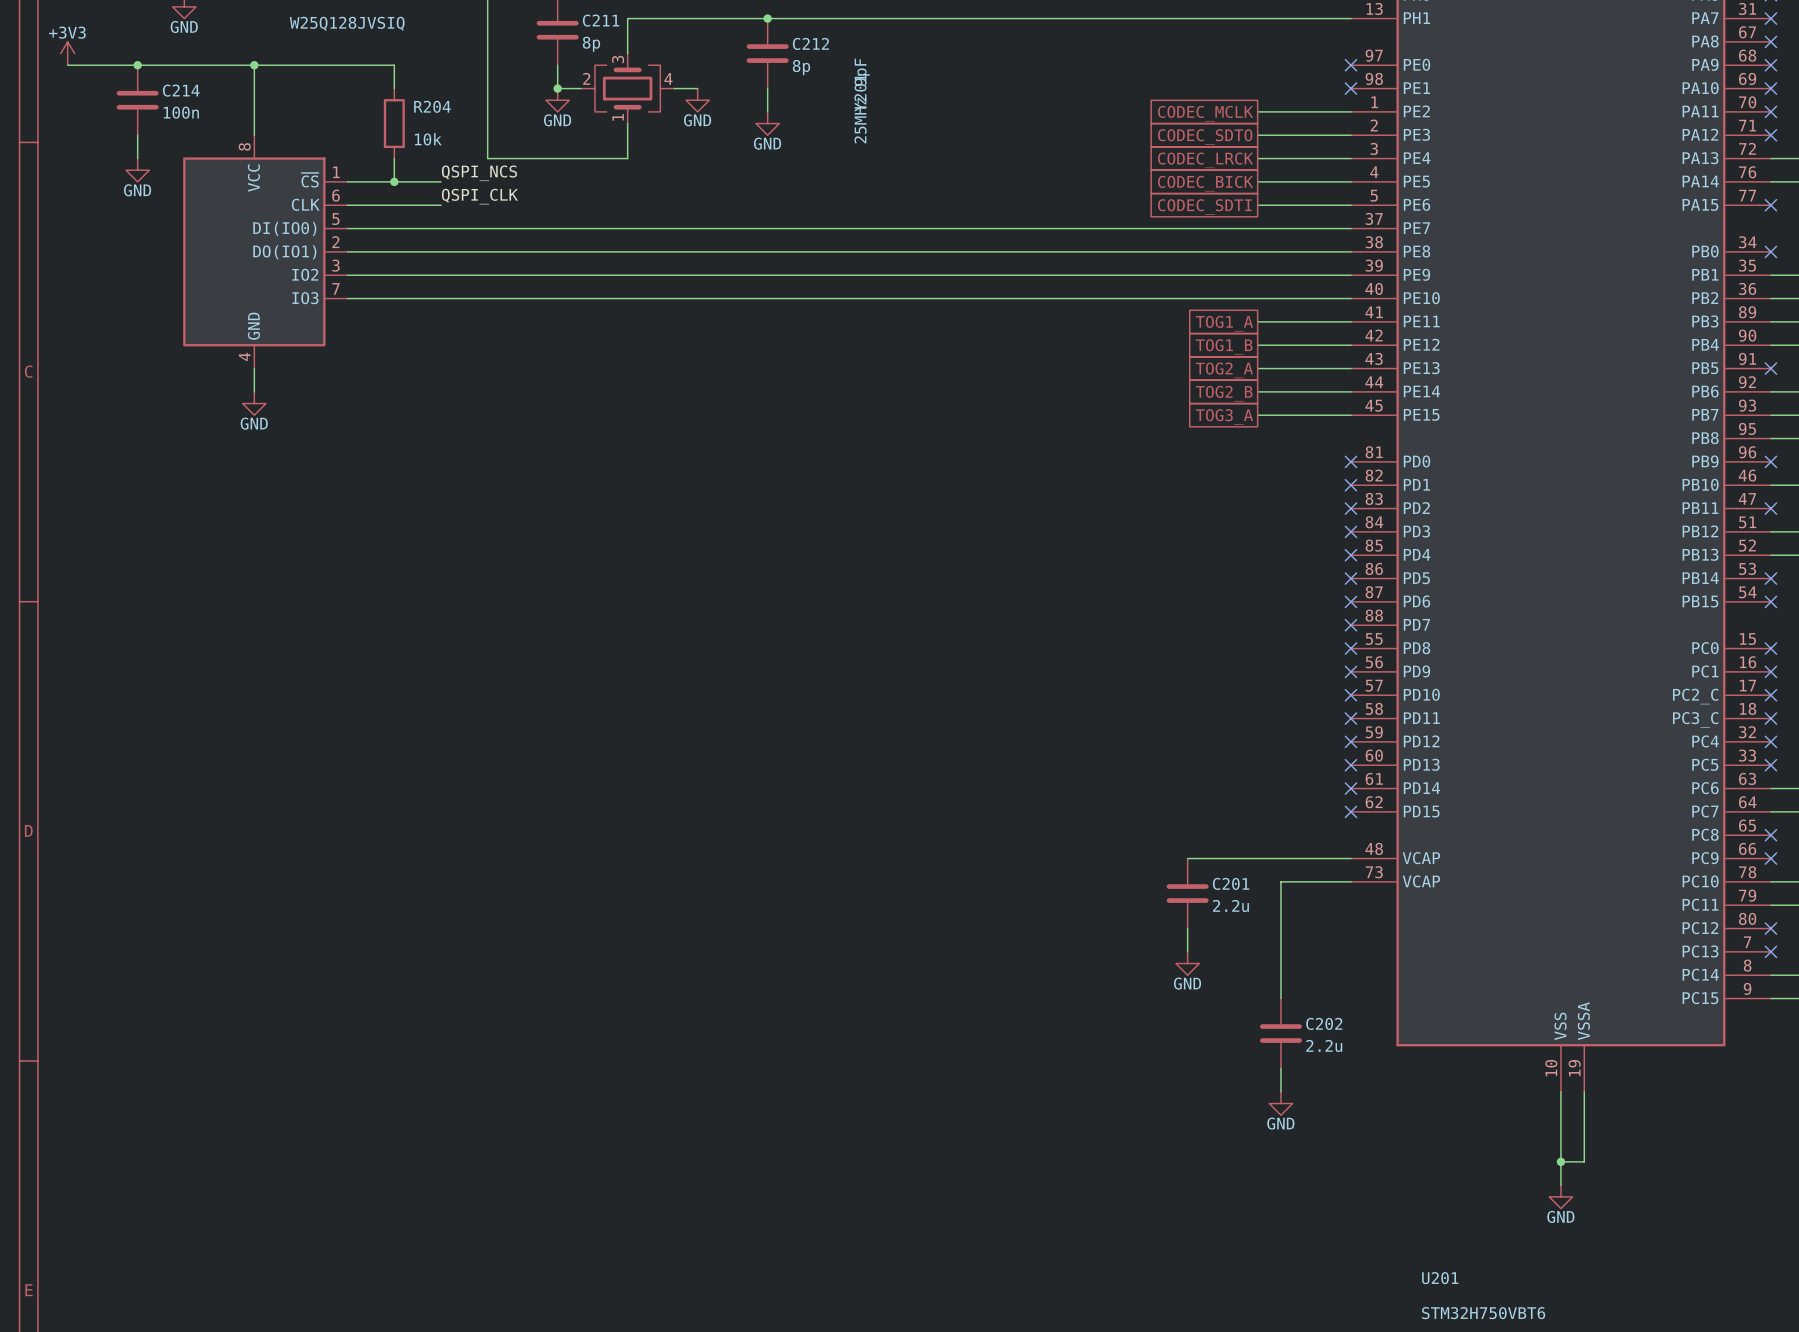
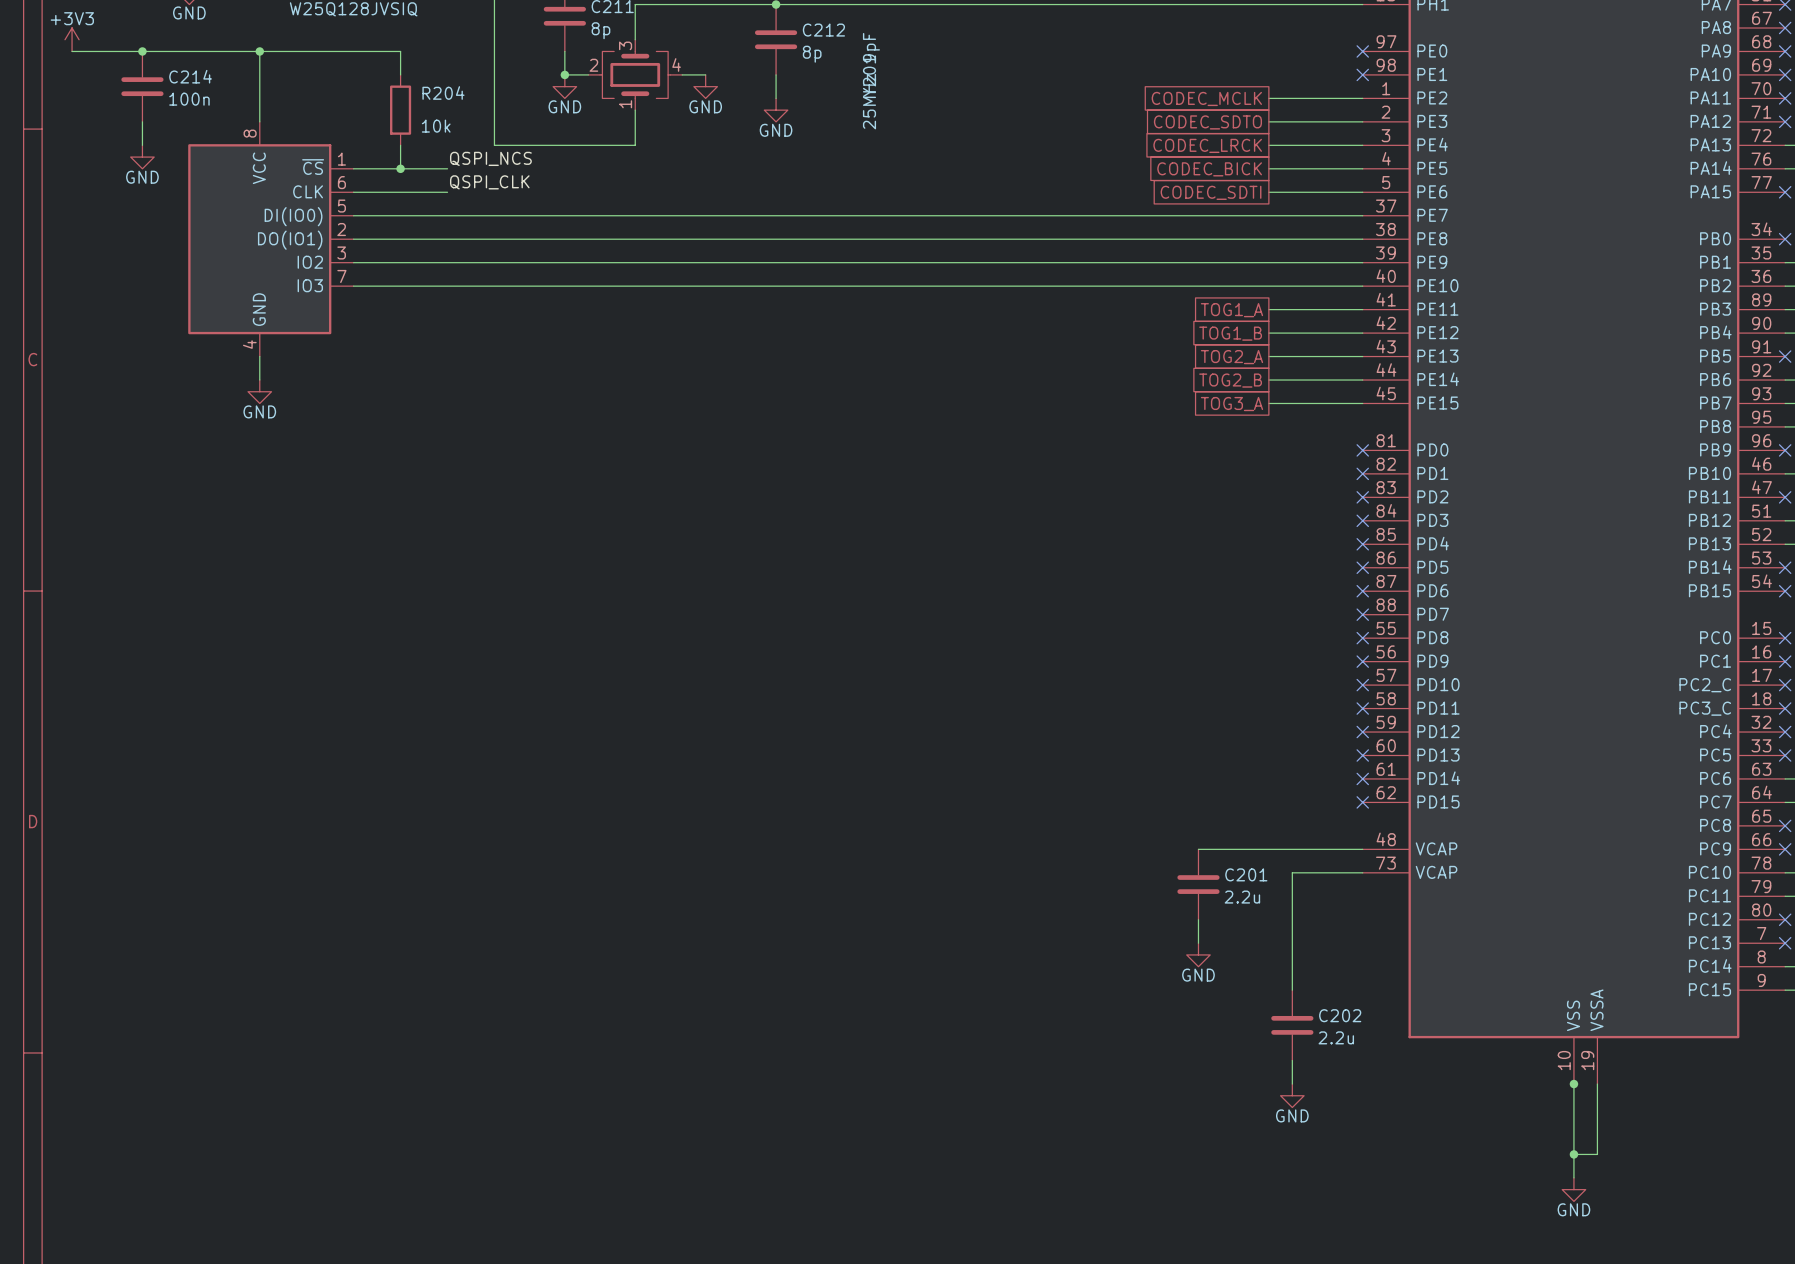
junction: none -> (1573, 1084)

